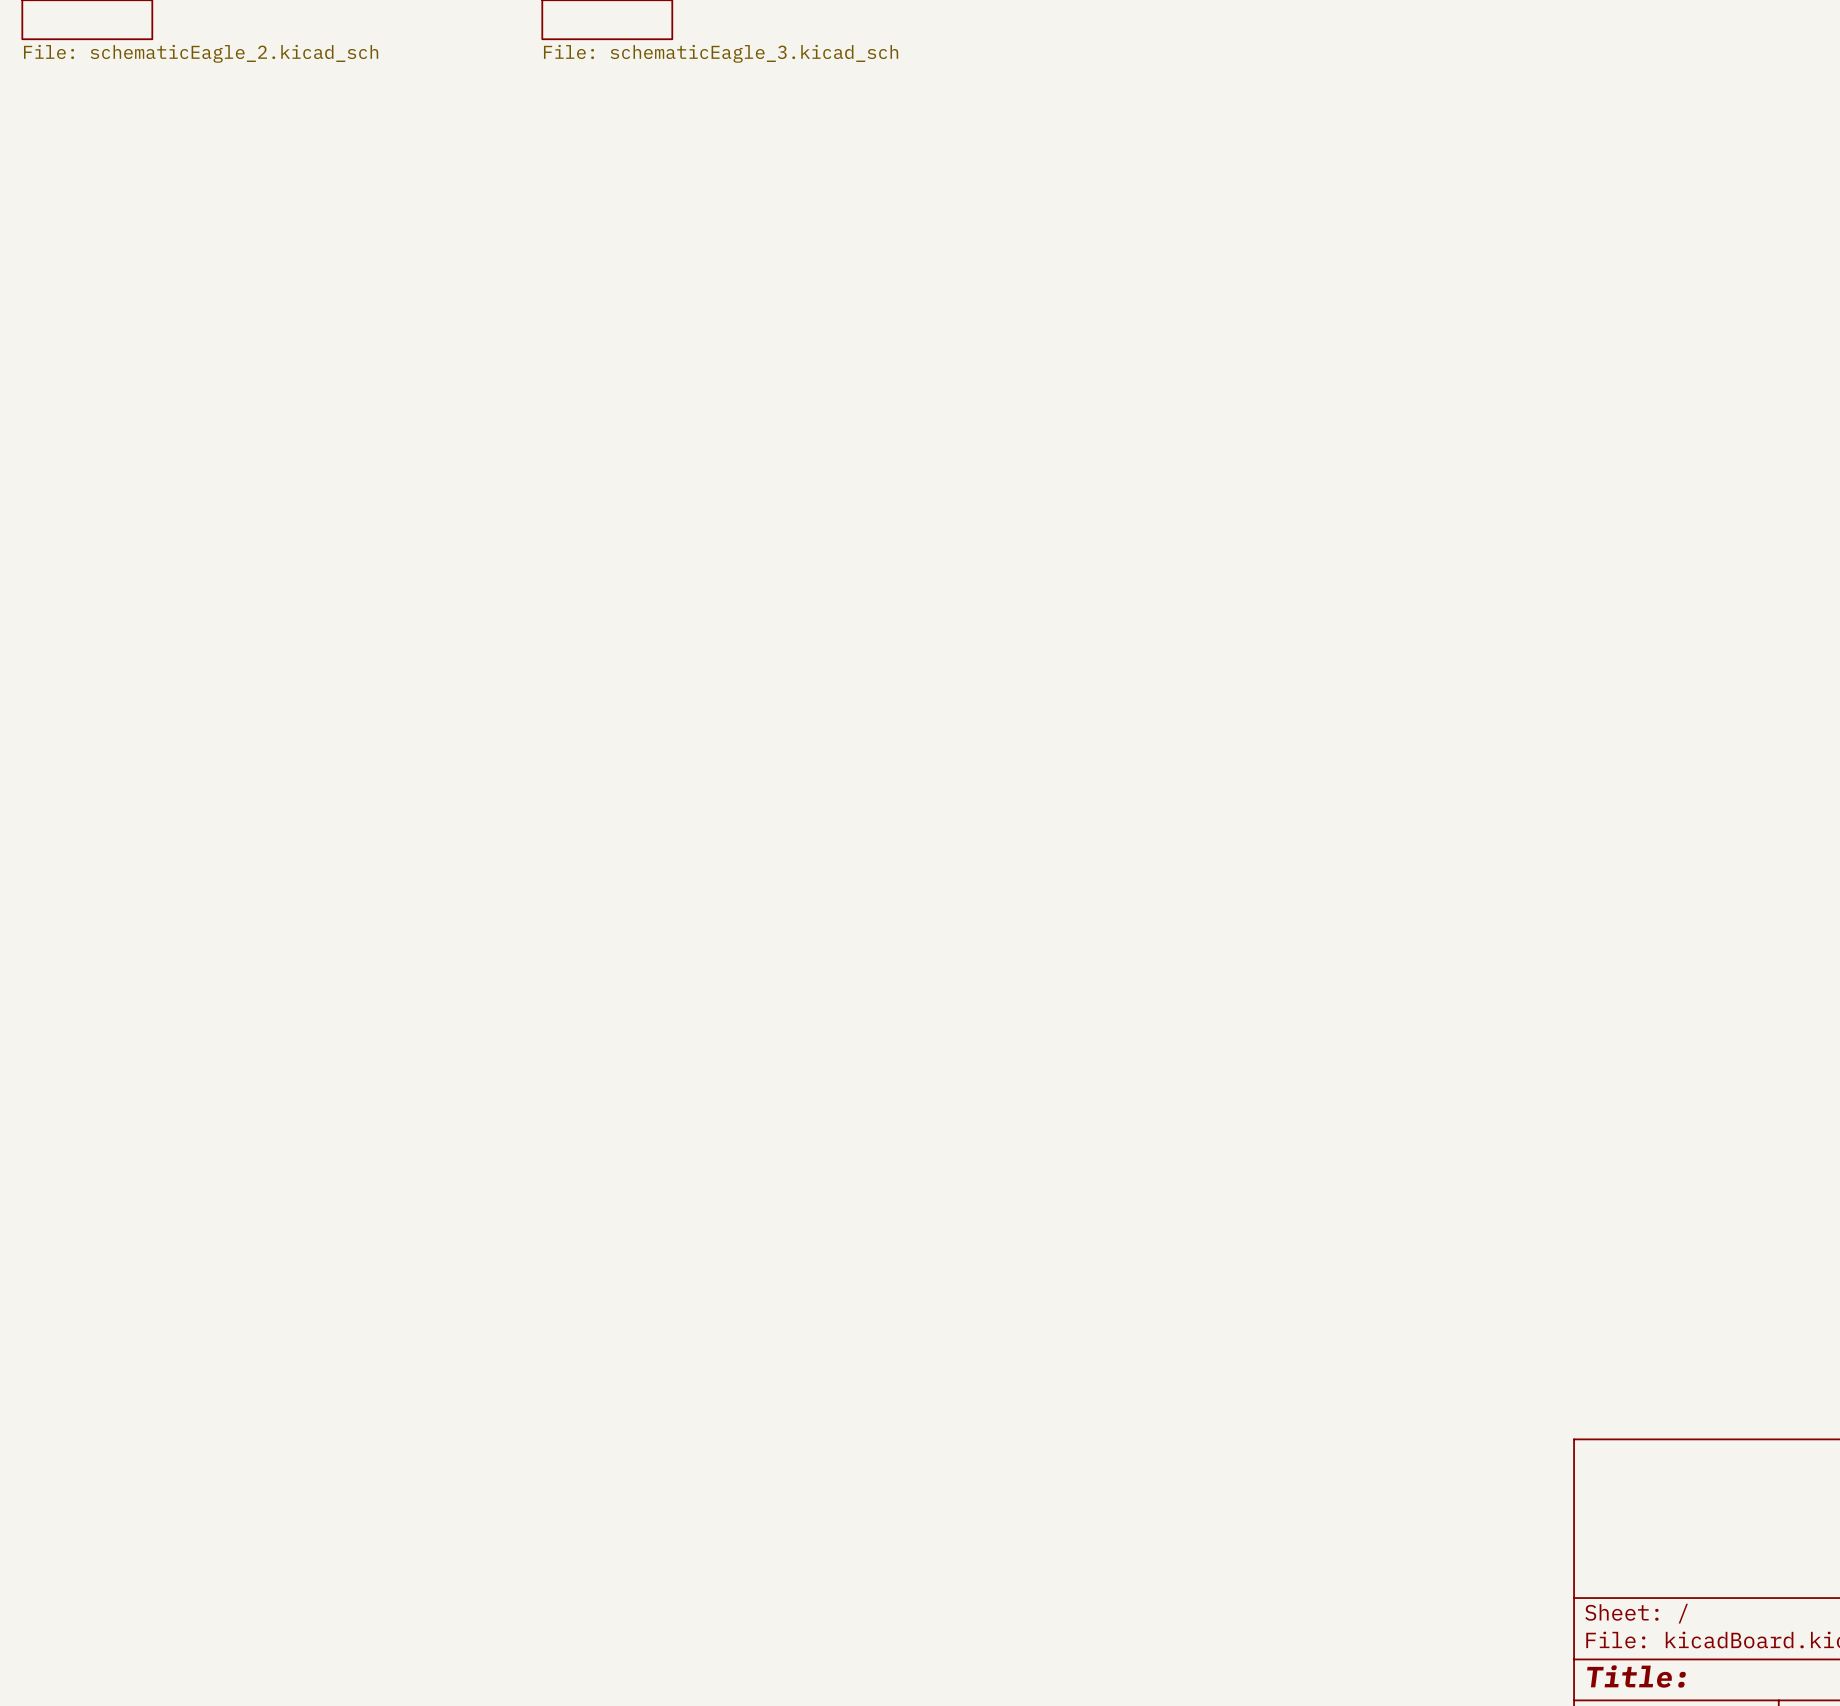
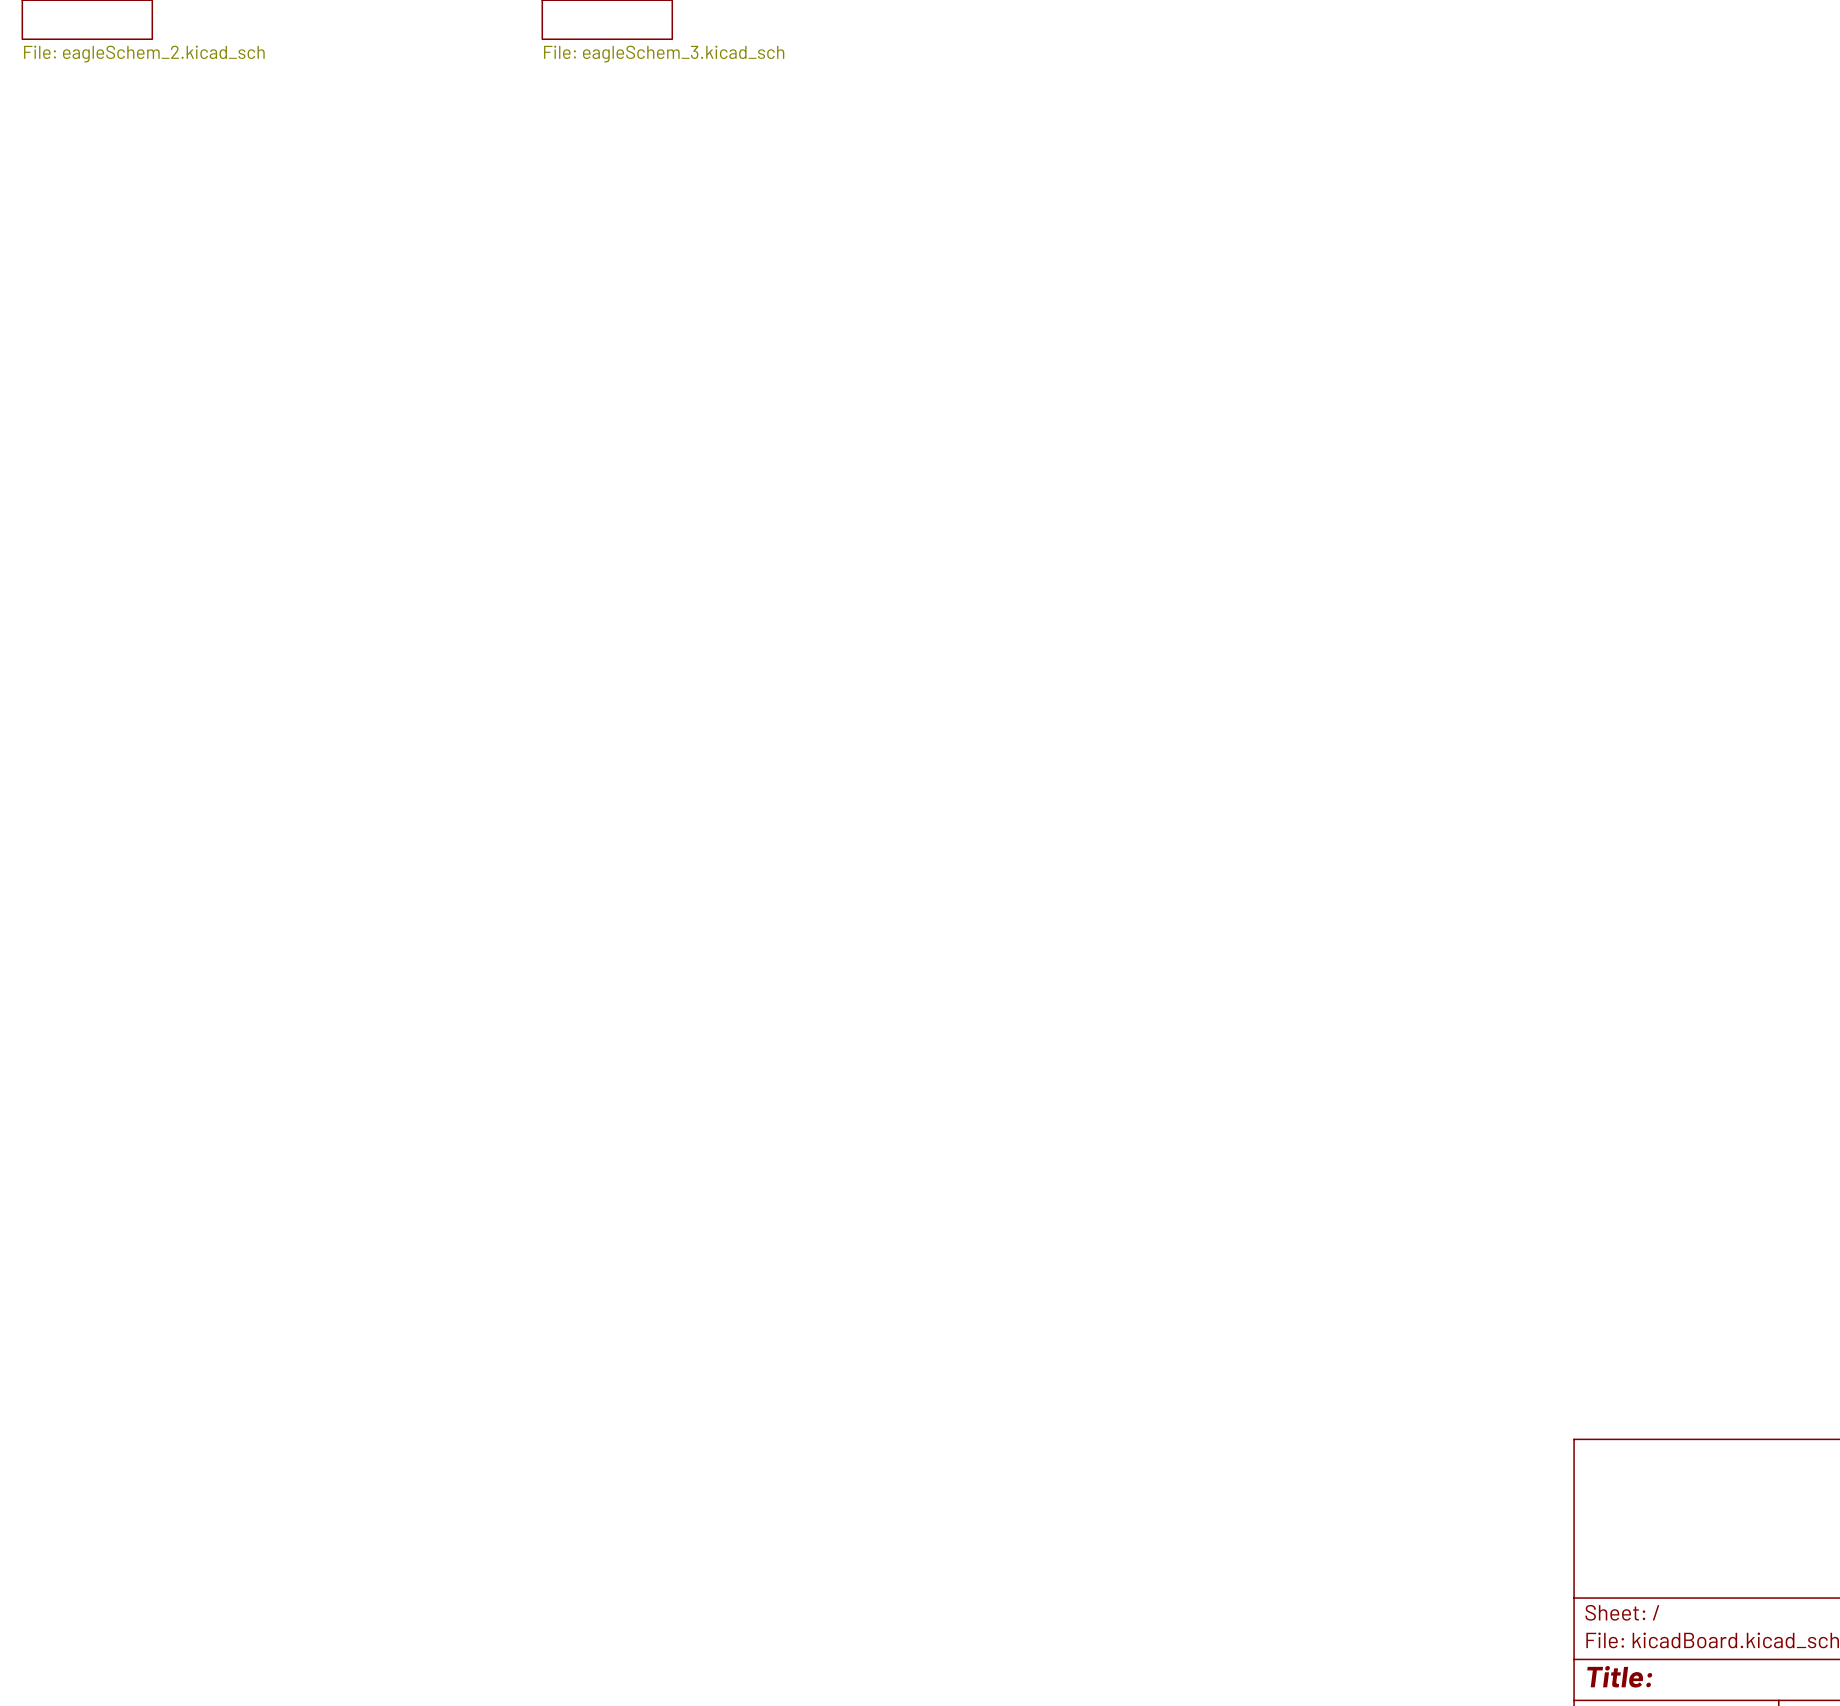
sheet value: File: schematicEagle_2.kicad_sch (201, 53) -> File: eagleSchem_2.kicad_sch (144, 54)
sheet value: File: schematicEagle_3.kicad_sch (721, 53) -> File: eagleSchem_3.kicad_sch (664, 54)

